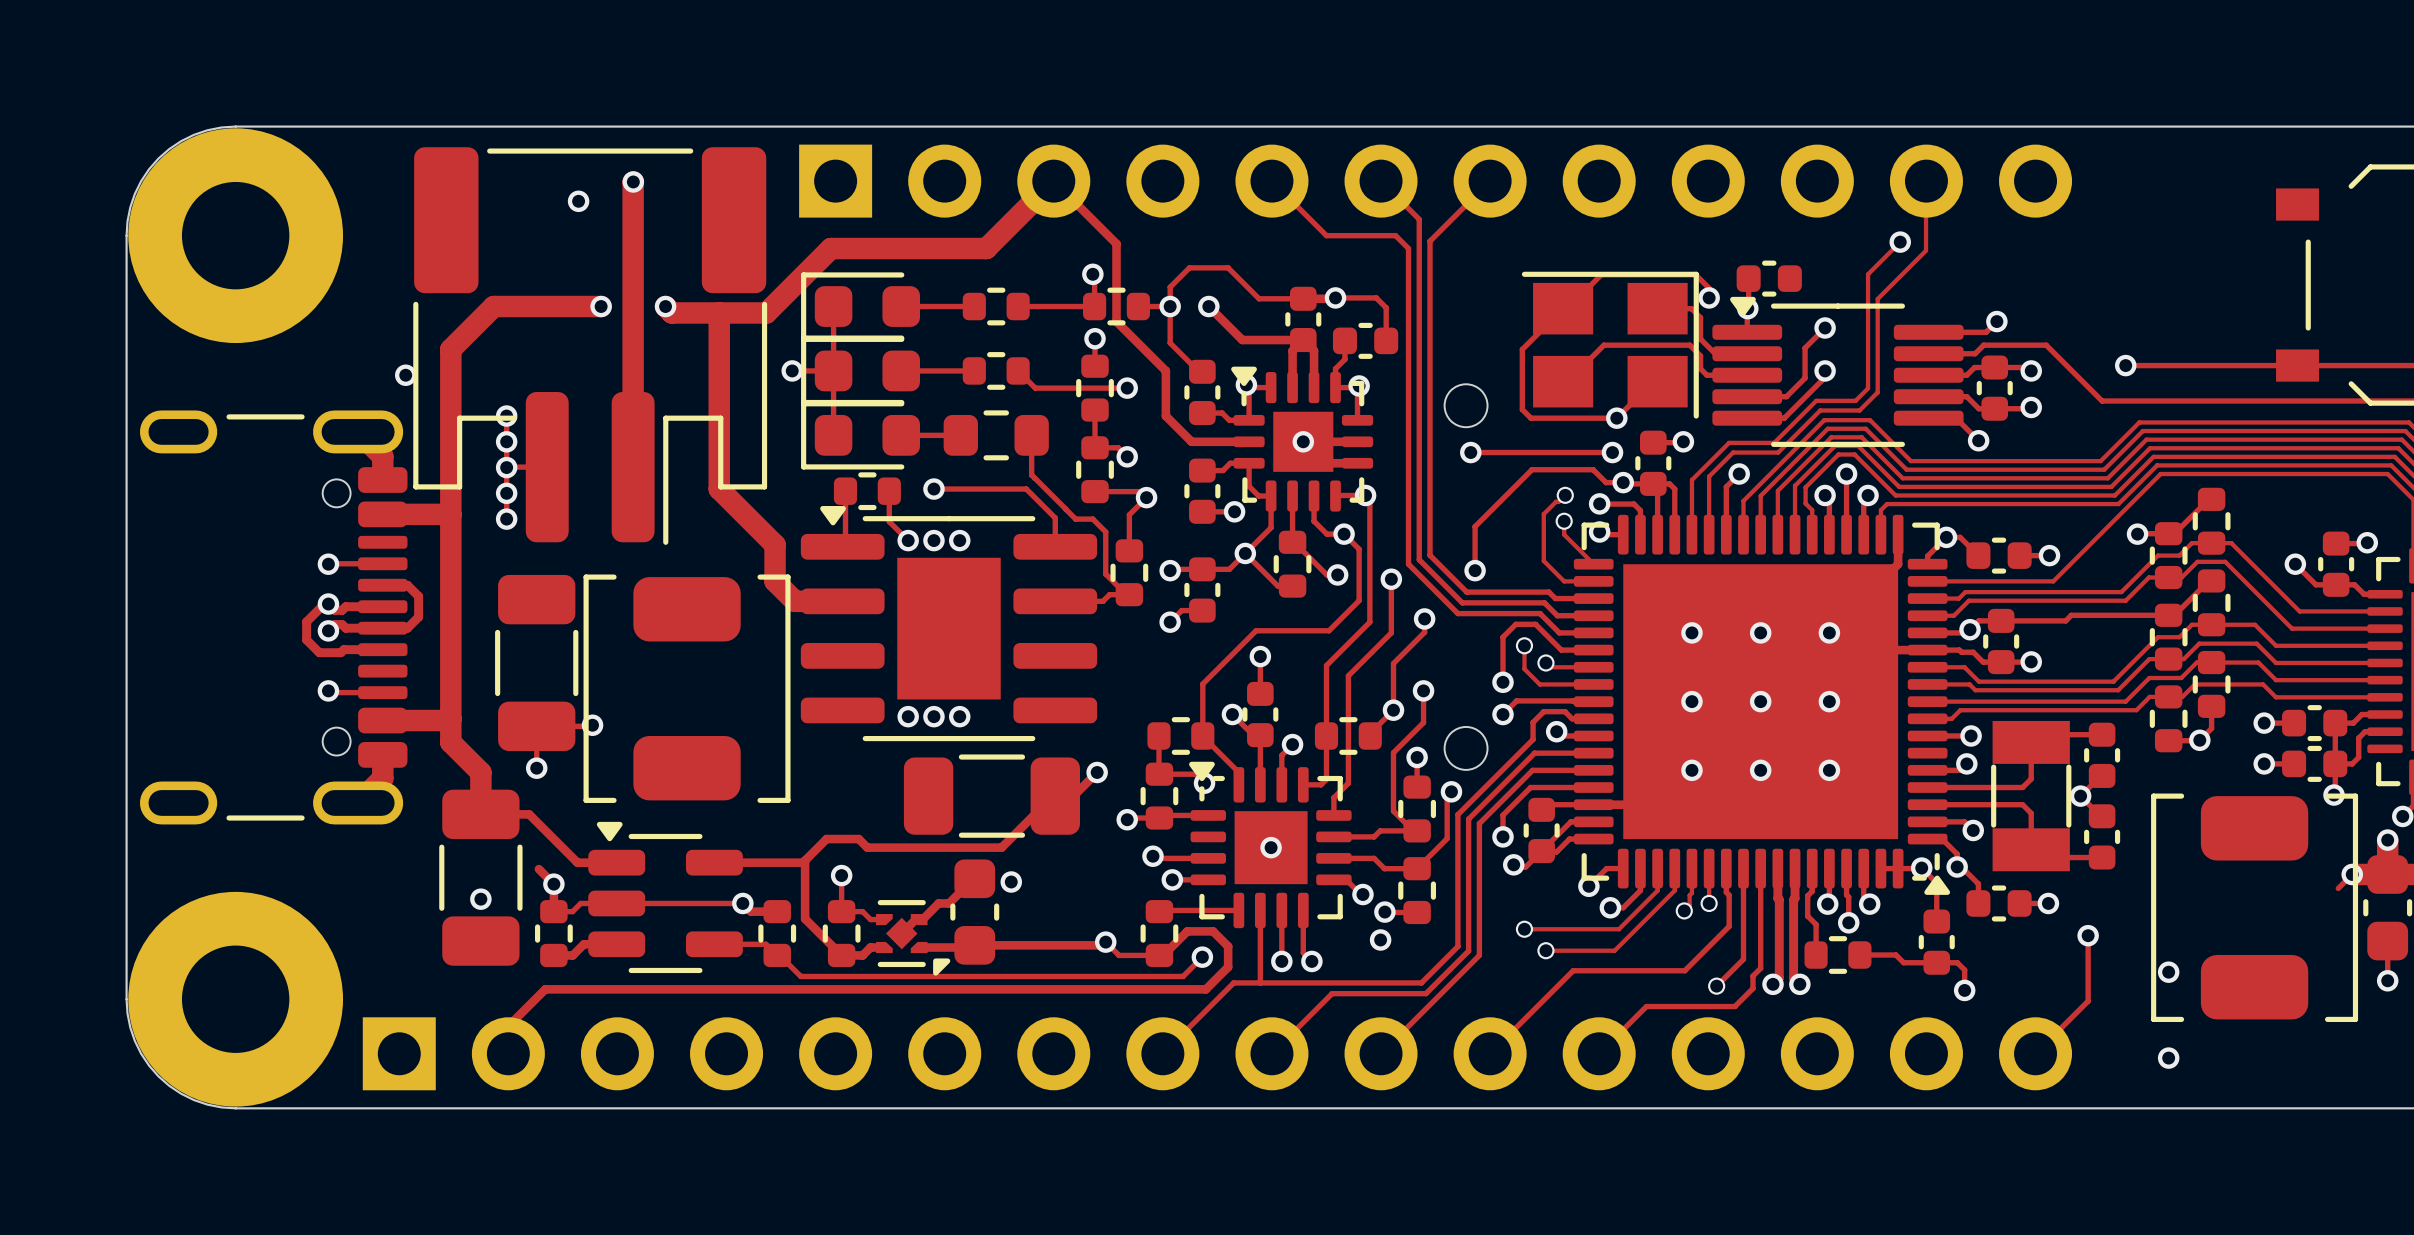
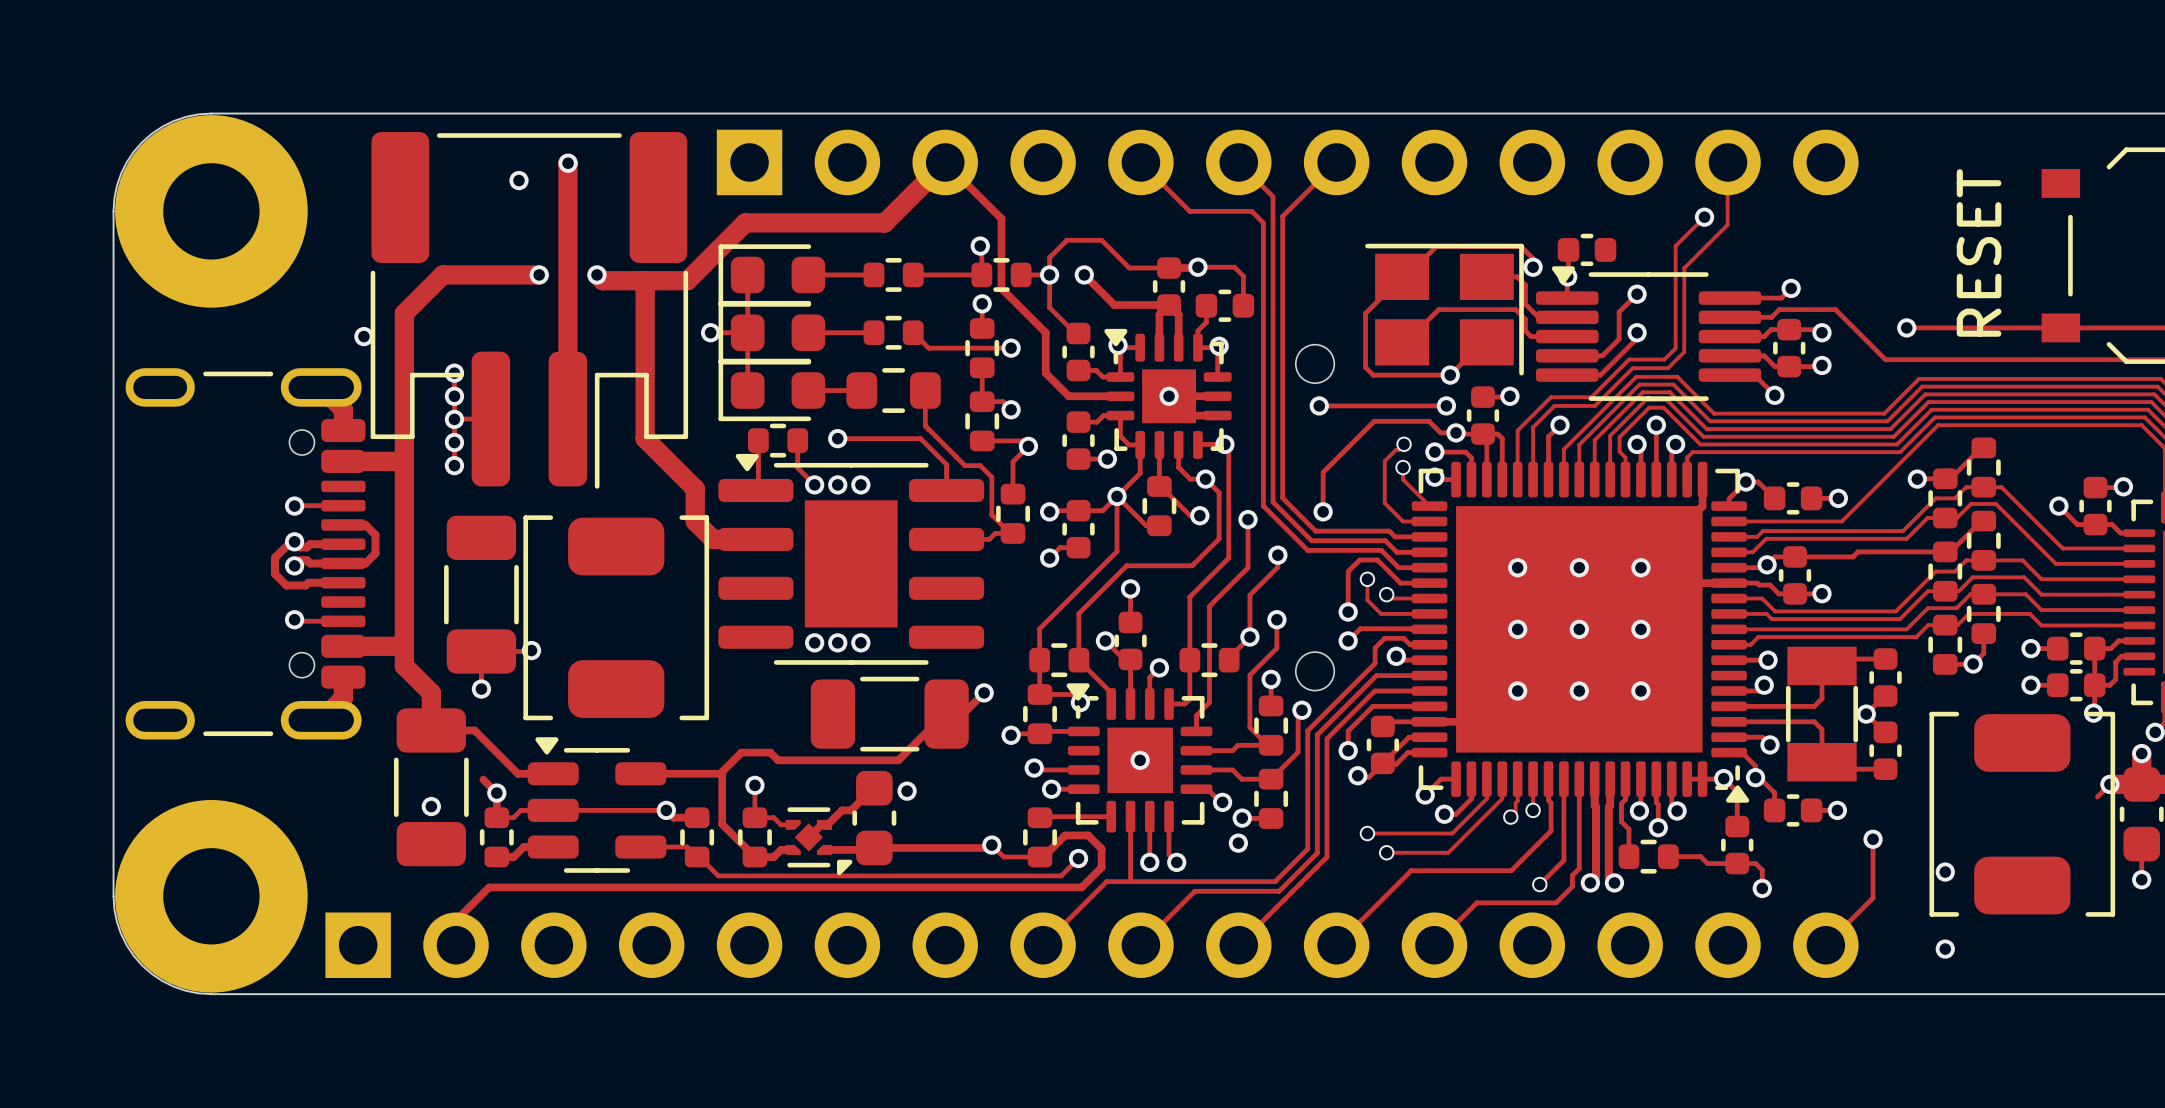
text: none -> RESET (1979, 252)
track: none -> (1117, 496) (1117, 551) (1039, 628) (1039, 660)

